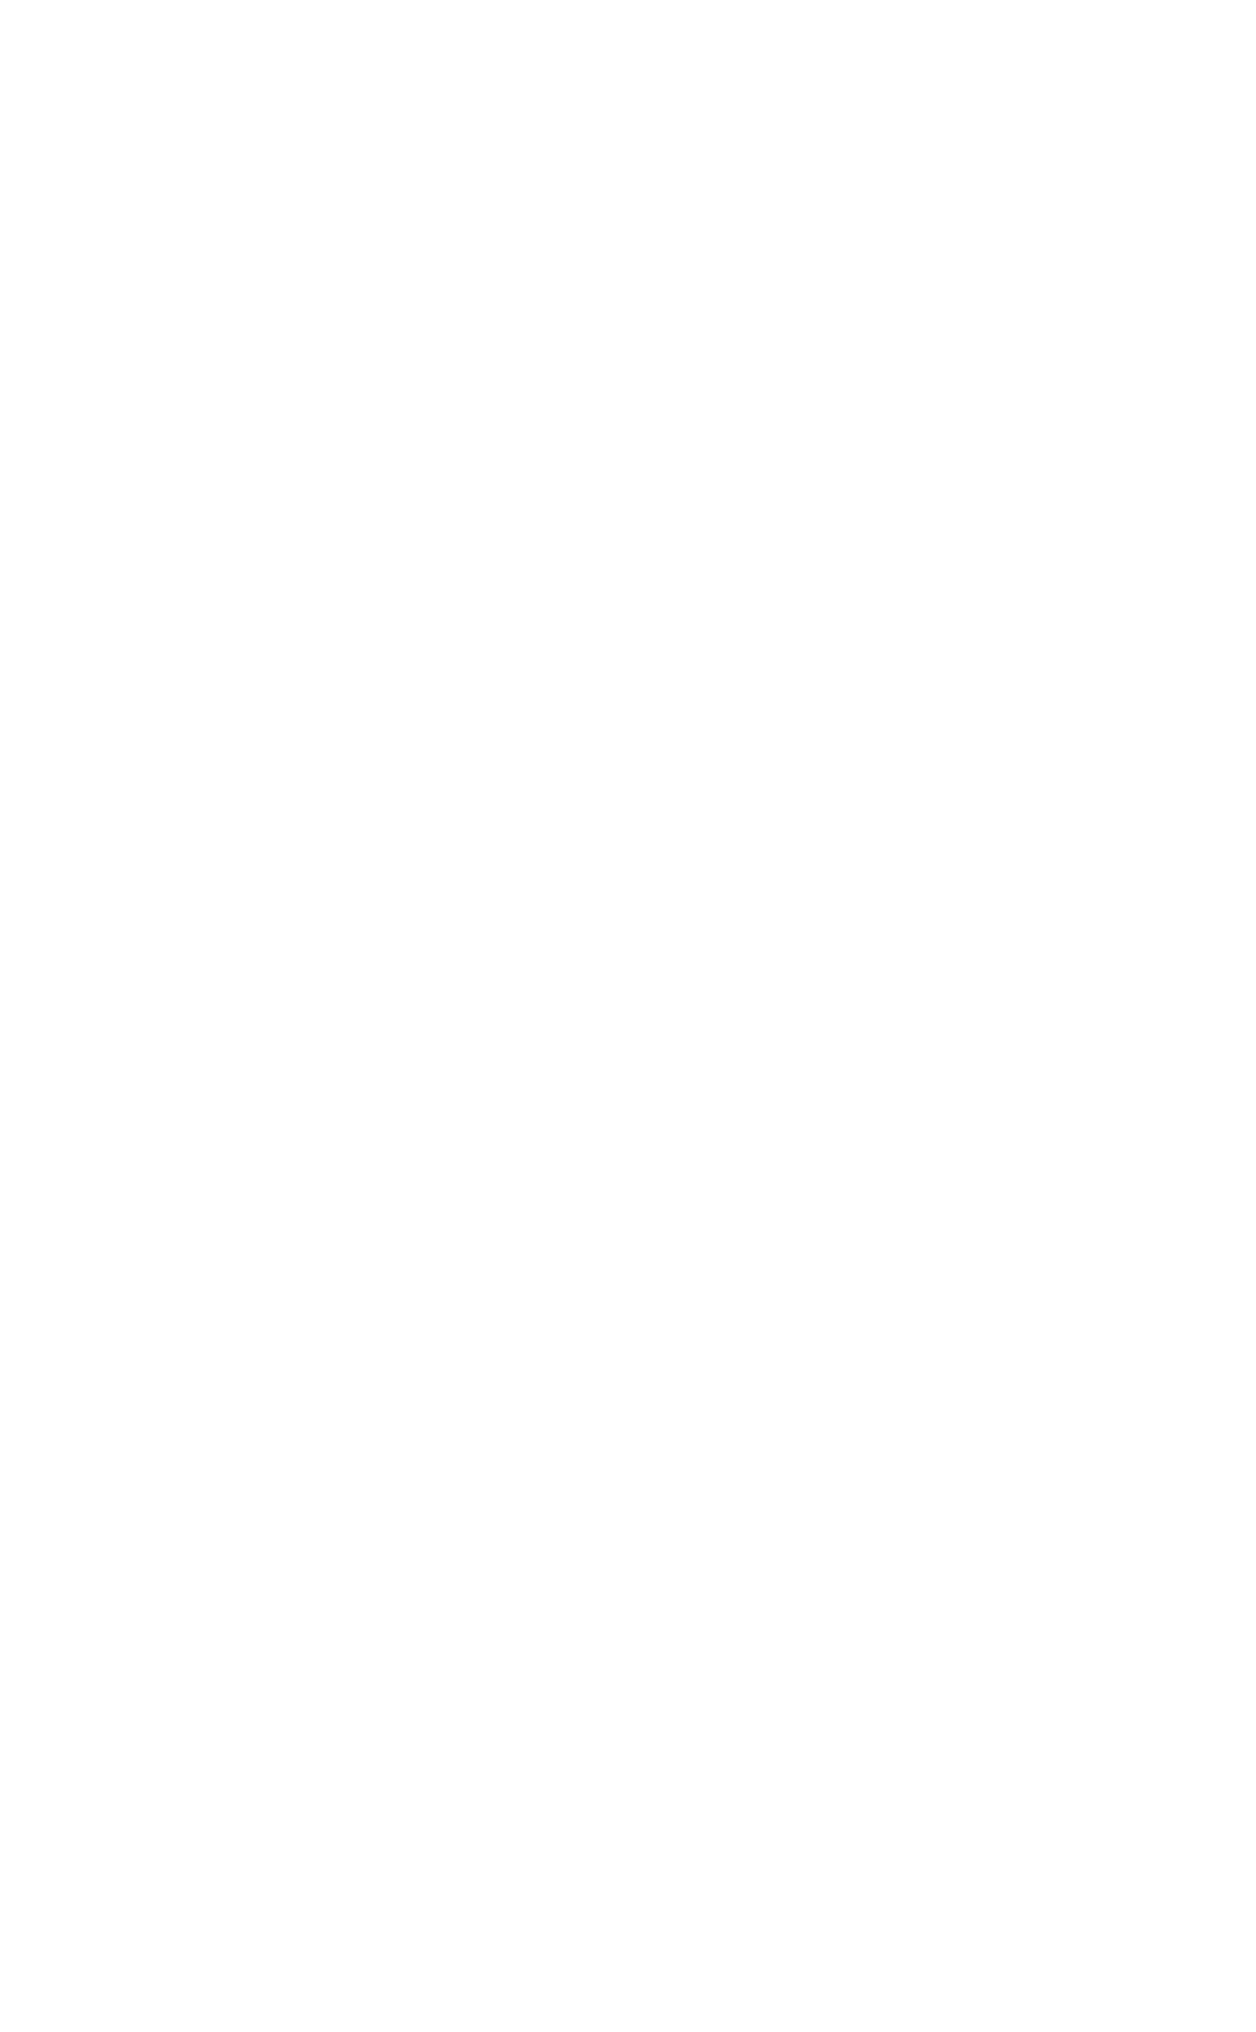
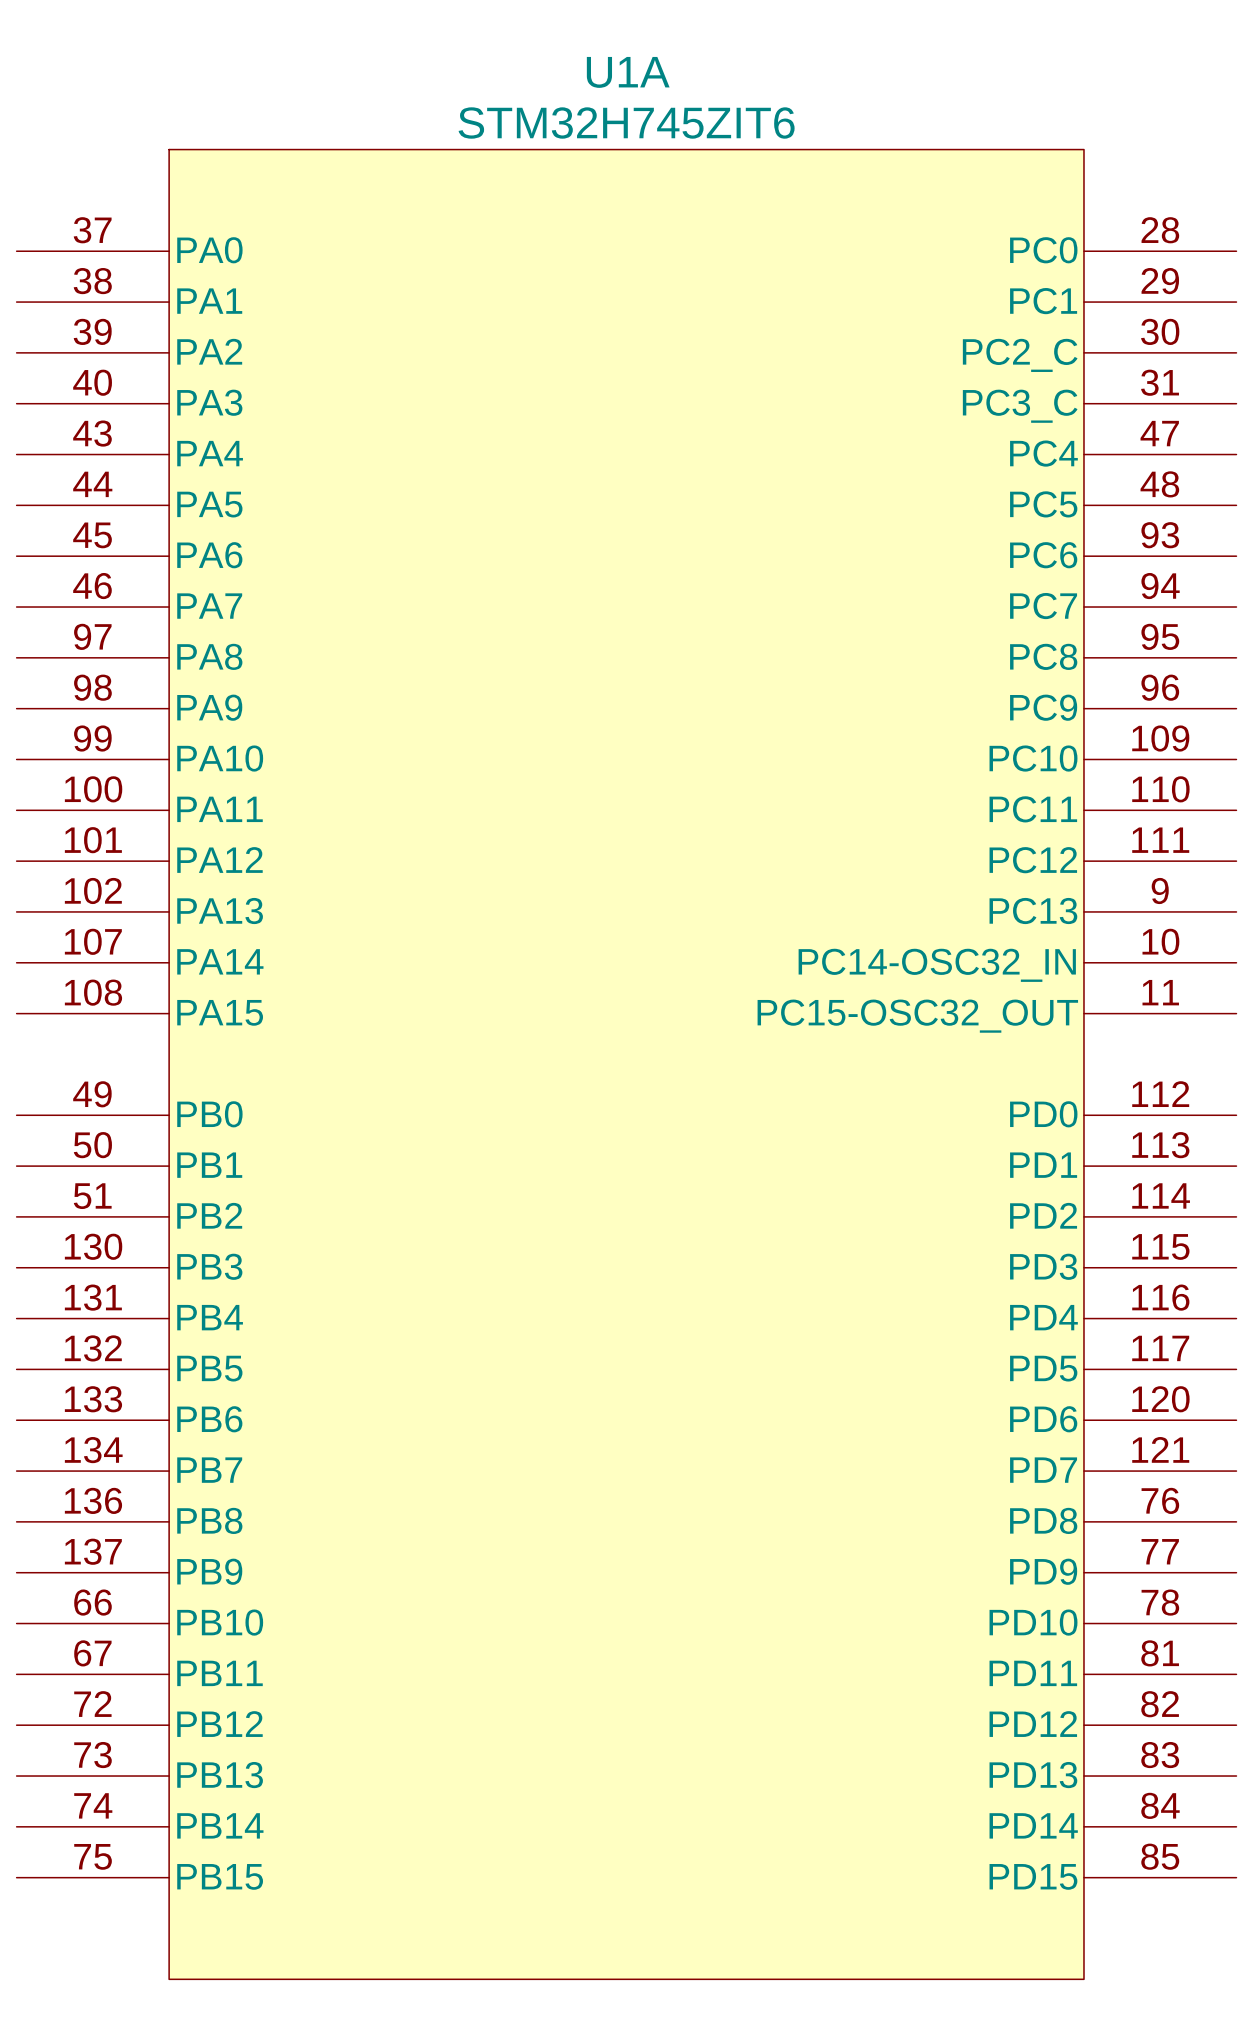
U1A: none -> STM32H745ZIT6 (626, 1064)

